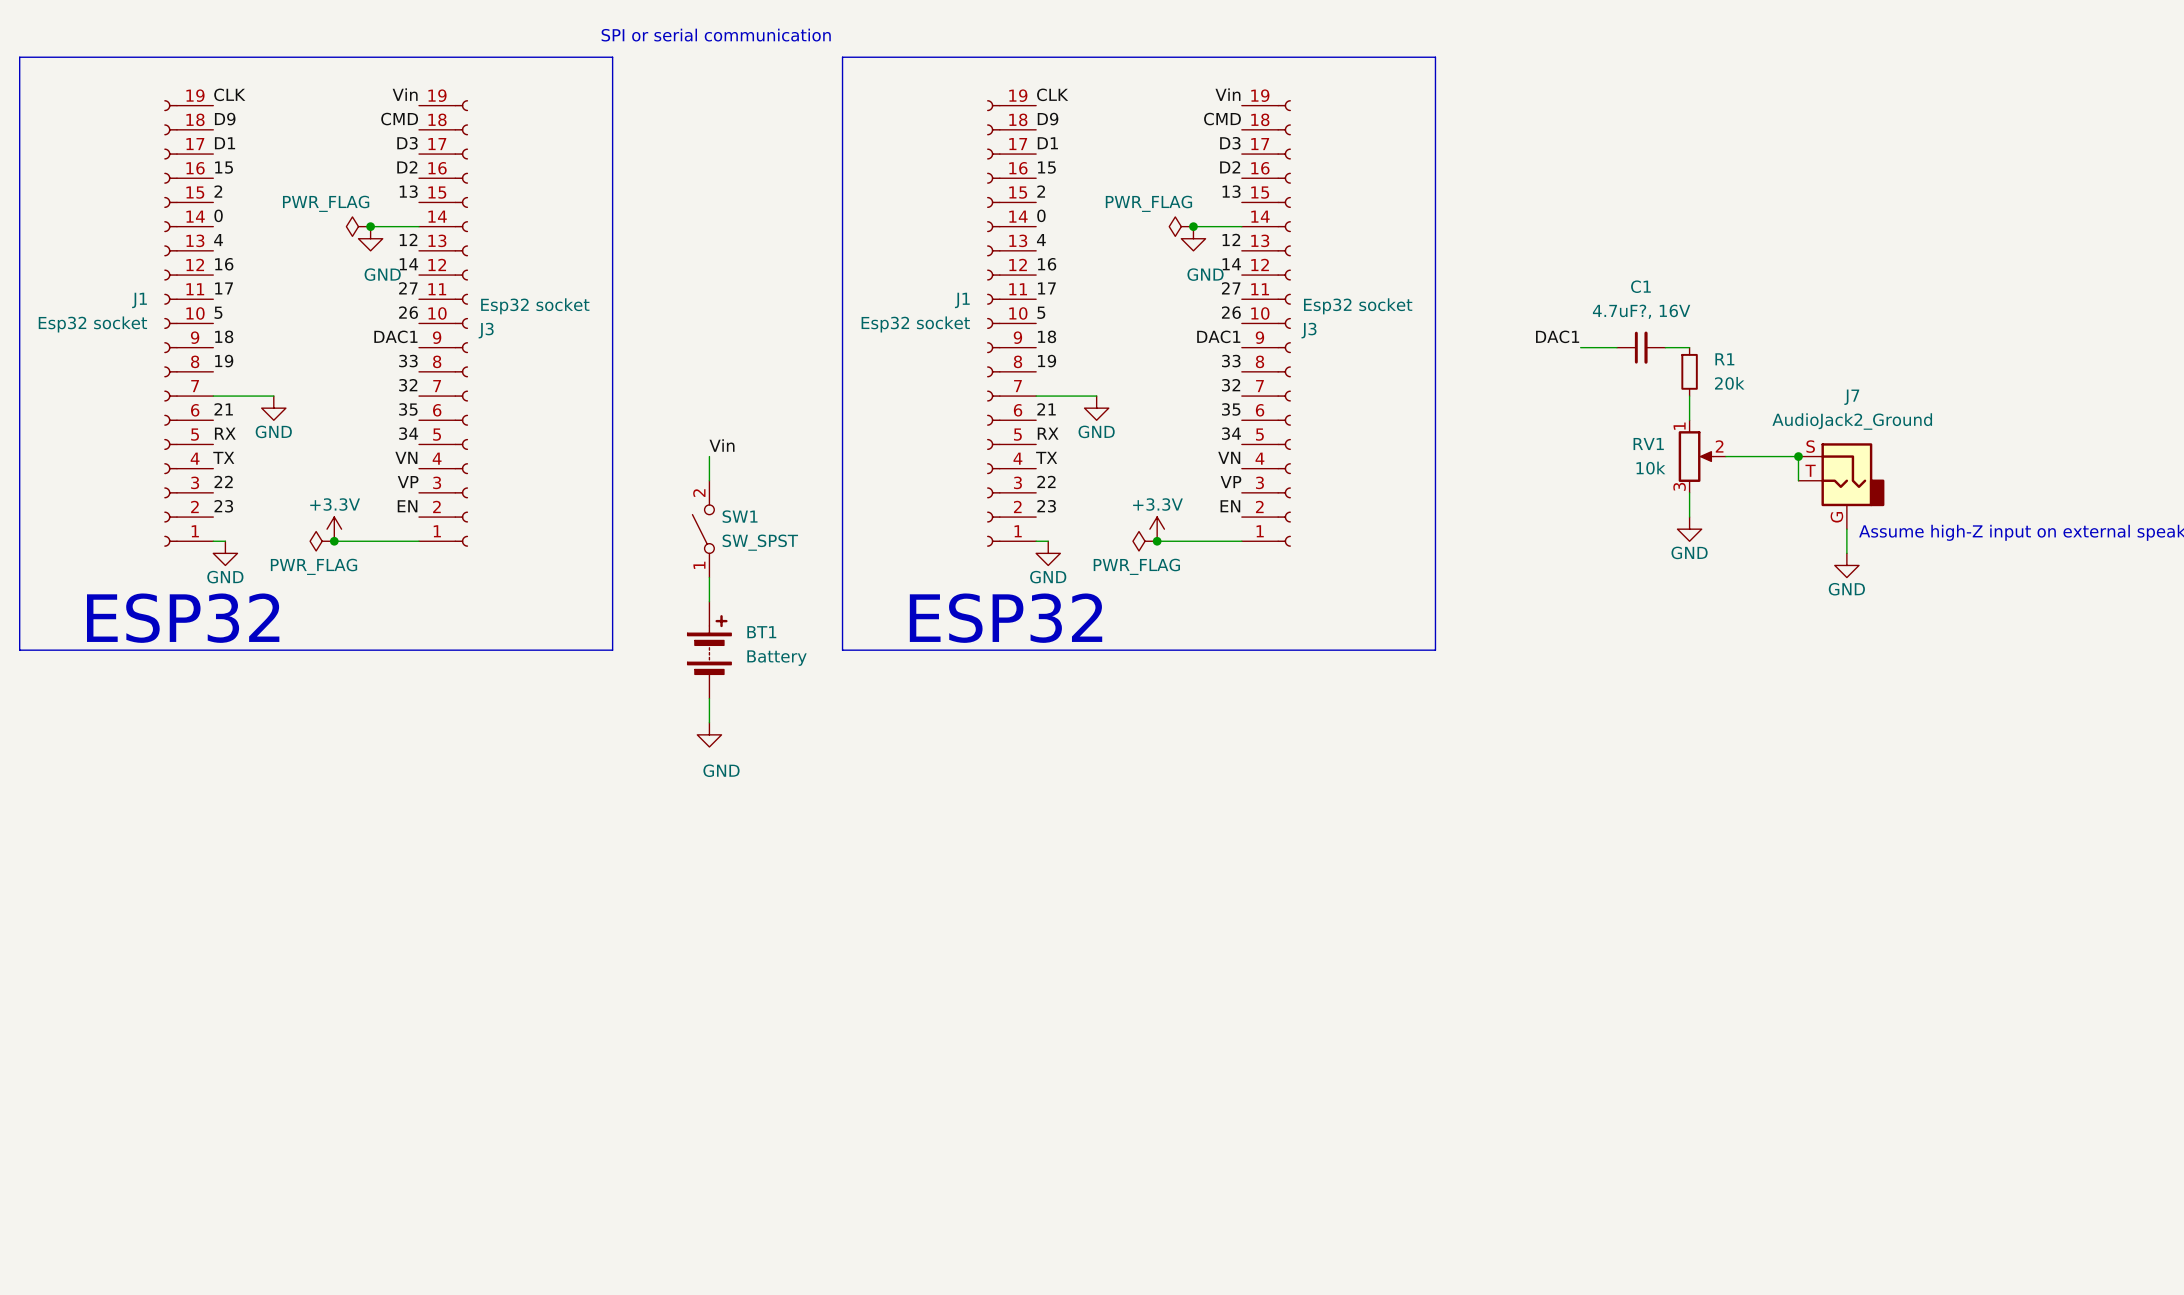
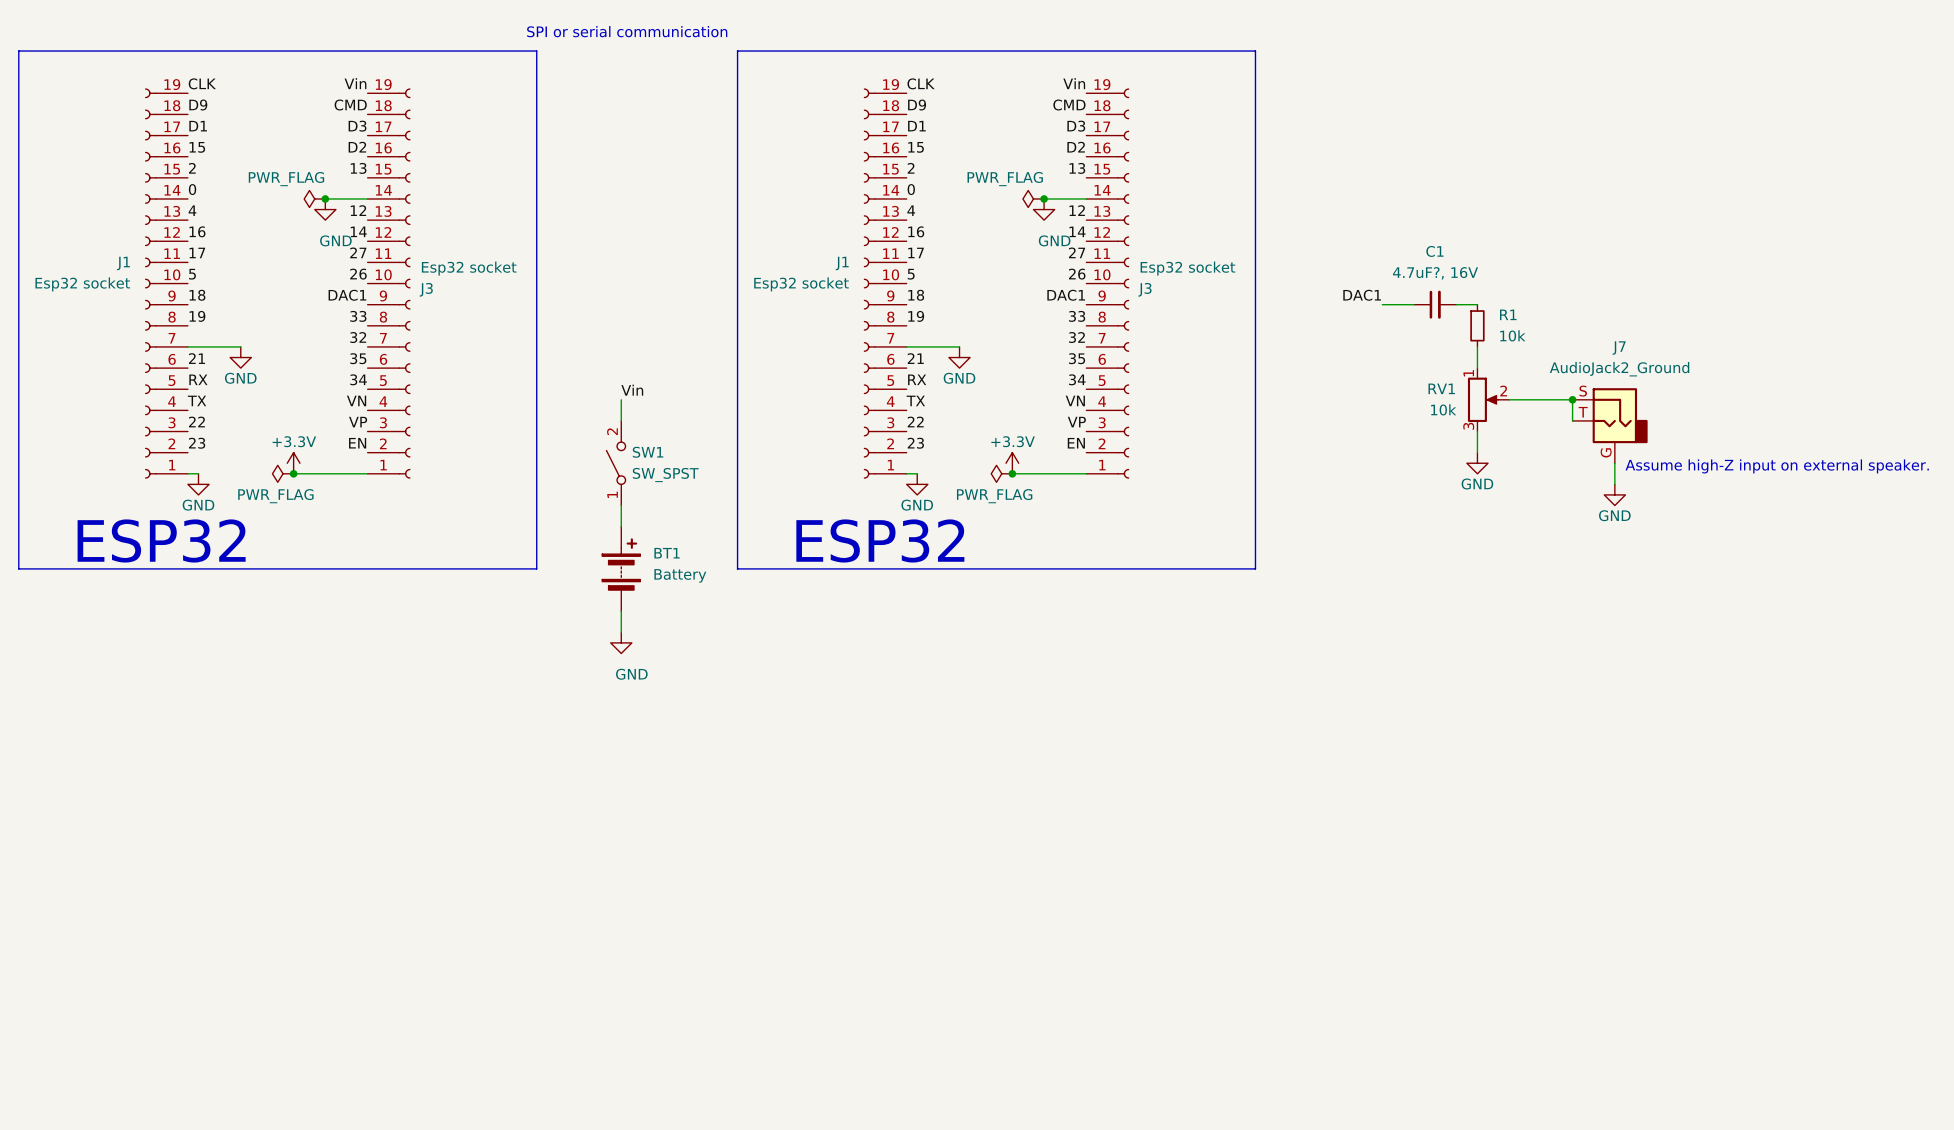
R1 value: 20k (1729, 383) -> 10k (1512, 335)

